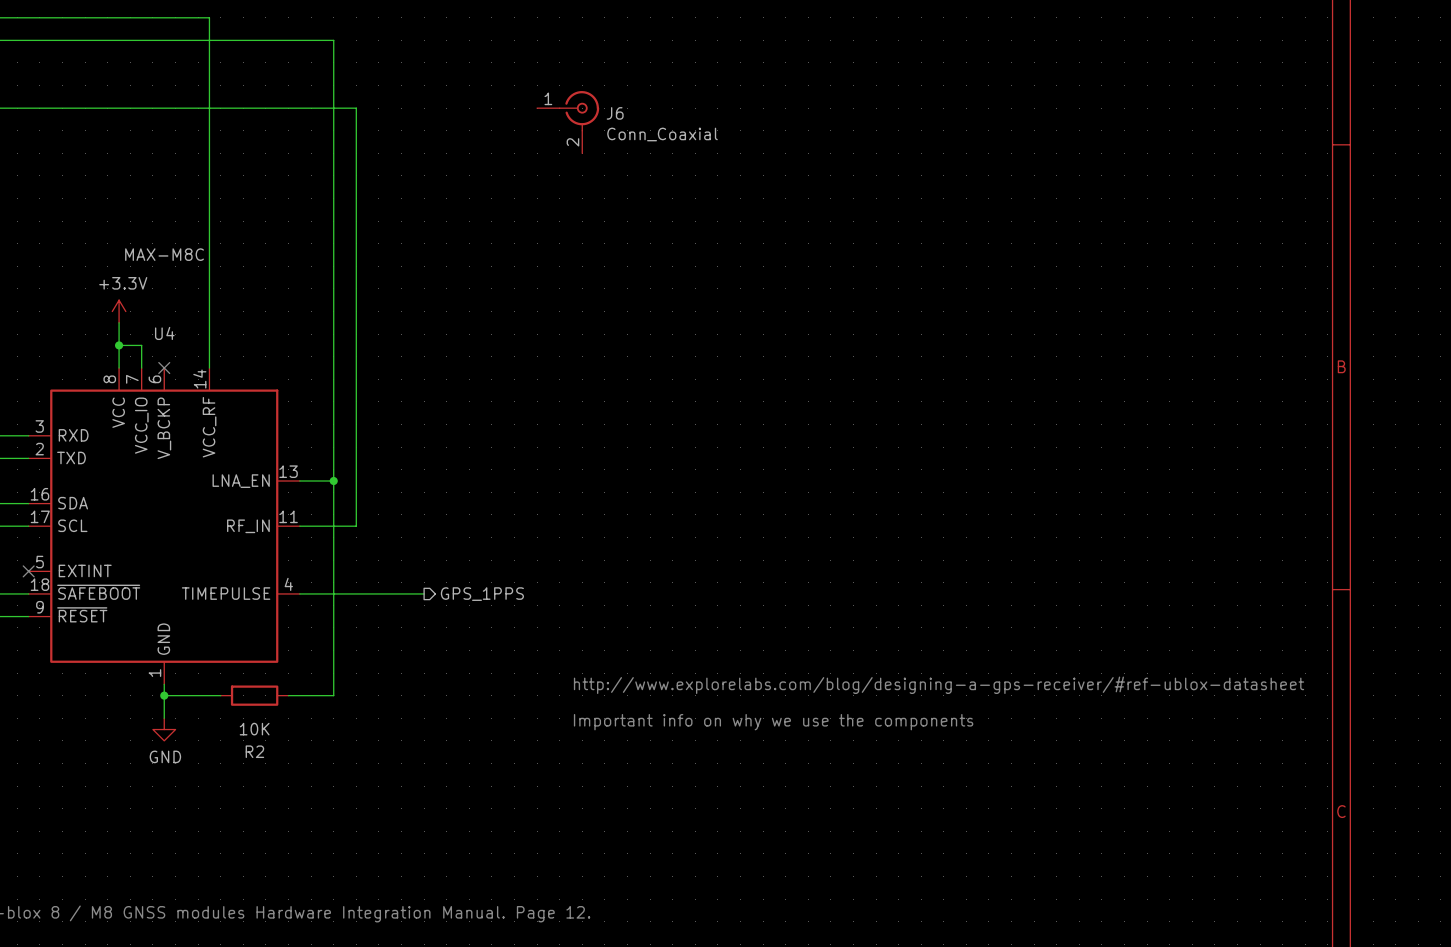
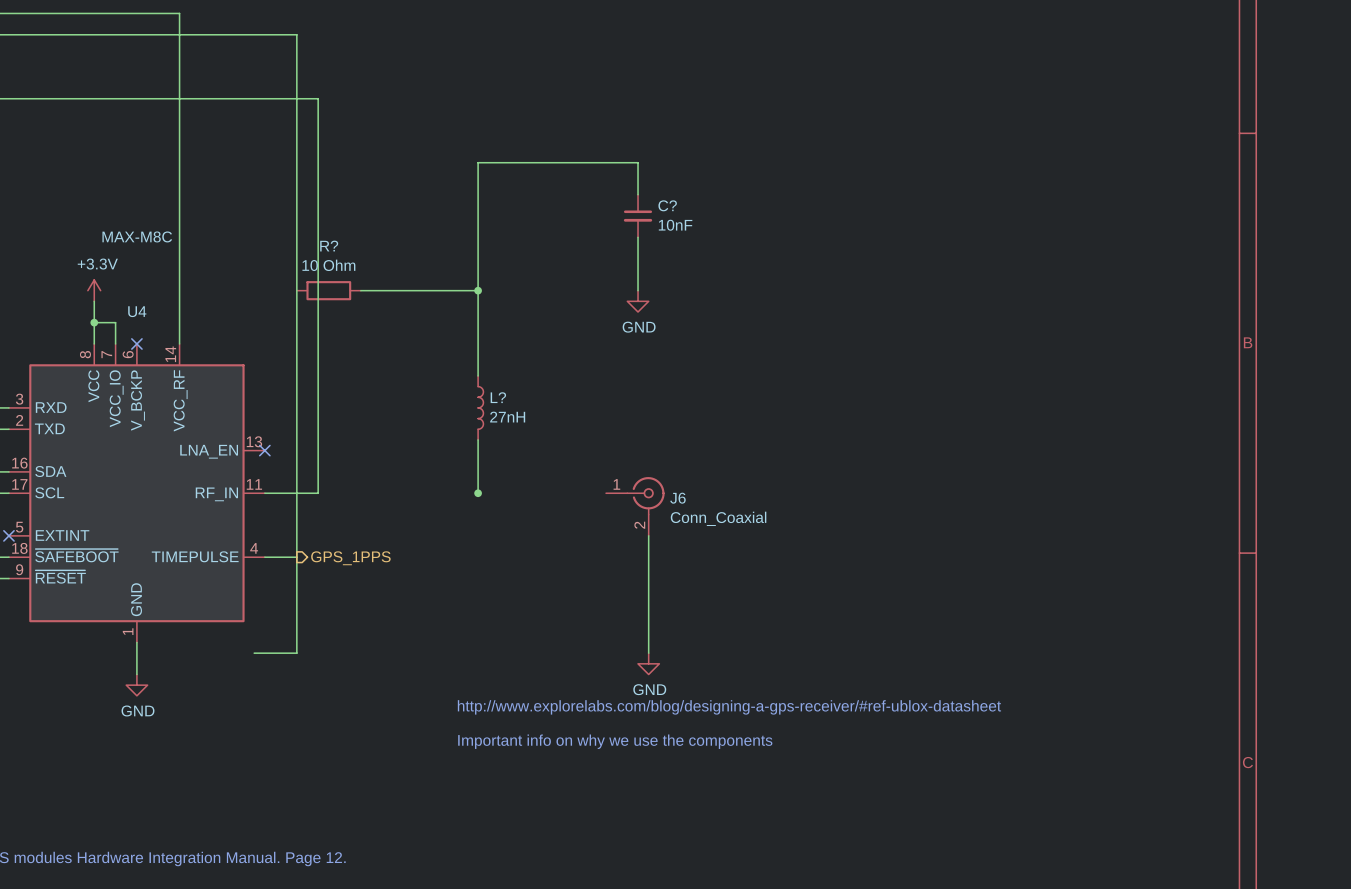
J6 position: (568, 122) -> (635, 506)
wire: none -> (638, 194) (638, 162) (478, 162) (478, 375)
C?: none -> 10nF (638, 216)
wire: none -> (638, 237) (638, 290)
R?: none -> 10 Ohm (328, 290)
wire: none -> (360, 290) (478, 290)
junction: none -> (478, 290)
power symbol: none -> GND (638, 301)
L?: none -> 27nH (480, 407)
wire: none -> (478, 439) (478, 493)
wire: (299, 480) (333, 480) -> none
no-connect mark: none -> (264, 450)
junction: (333, 480) -> none
junction: none -> (478, 493)
wire: none -> (648, 535) (648, 653)
wire: (333, 593) (424, 593) -> none
hierarchical label position: GPS_1PPS (482, 594) -> GPS_1PPS (350, 558)
text position: http://www.explorelabs.com/blog/designing-a-gps-receiver/#ref-ublox-datasheet (939, 685) -> http://www.explorelabs.com/blog/designing-a-gps-receiver/#ref-ublox-datasheet (729, 707)
wire: (164, 695) (220, 695) -> none
junction: (164, 695) -> none
R2: 10K (254, 695) -> none
power symbol: none -> GND (648, 663)
text position: Important info on why we use the components (773, 722) -> Important info on why we use the components (615, 741)

